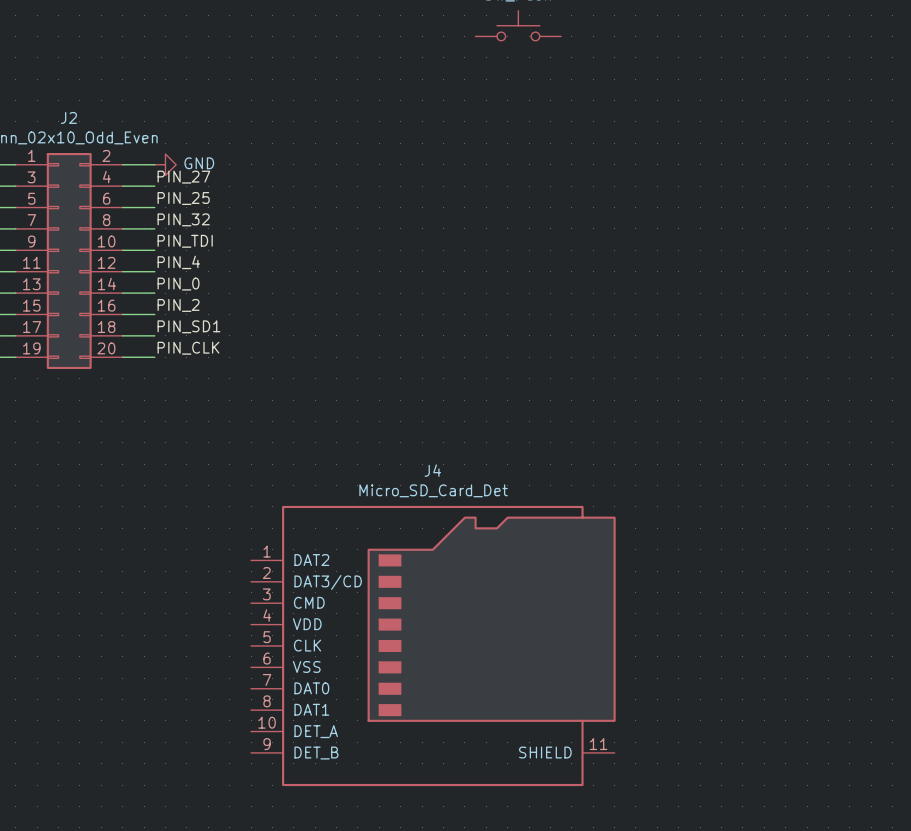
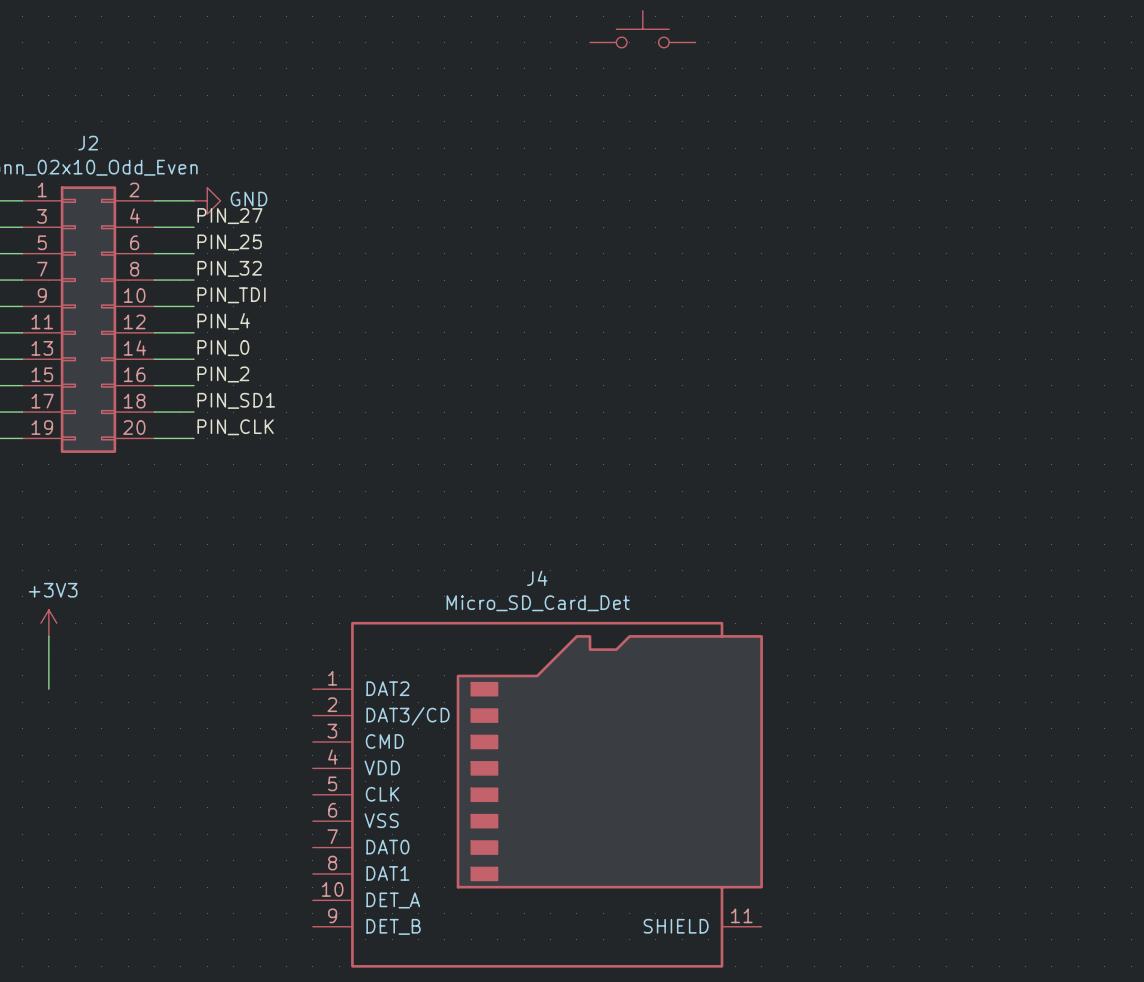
power symbol: none -> +3V3 (48, 623)
wire: none -> (48, 636) (48, 689)

